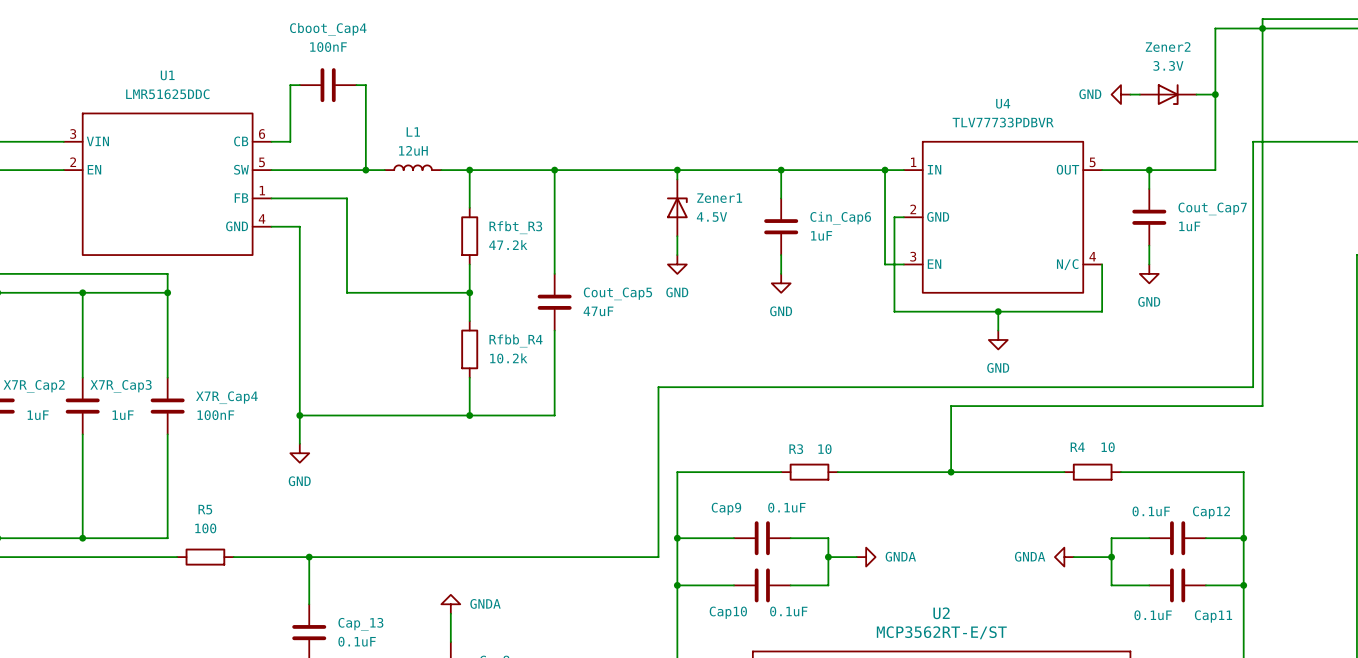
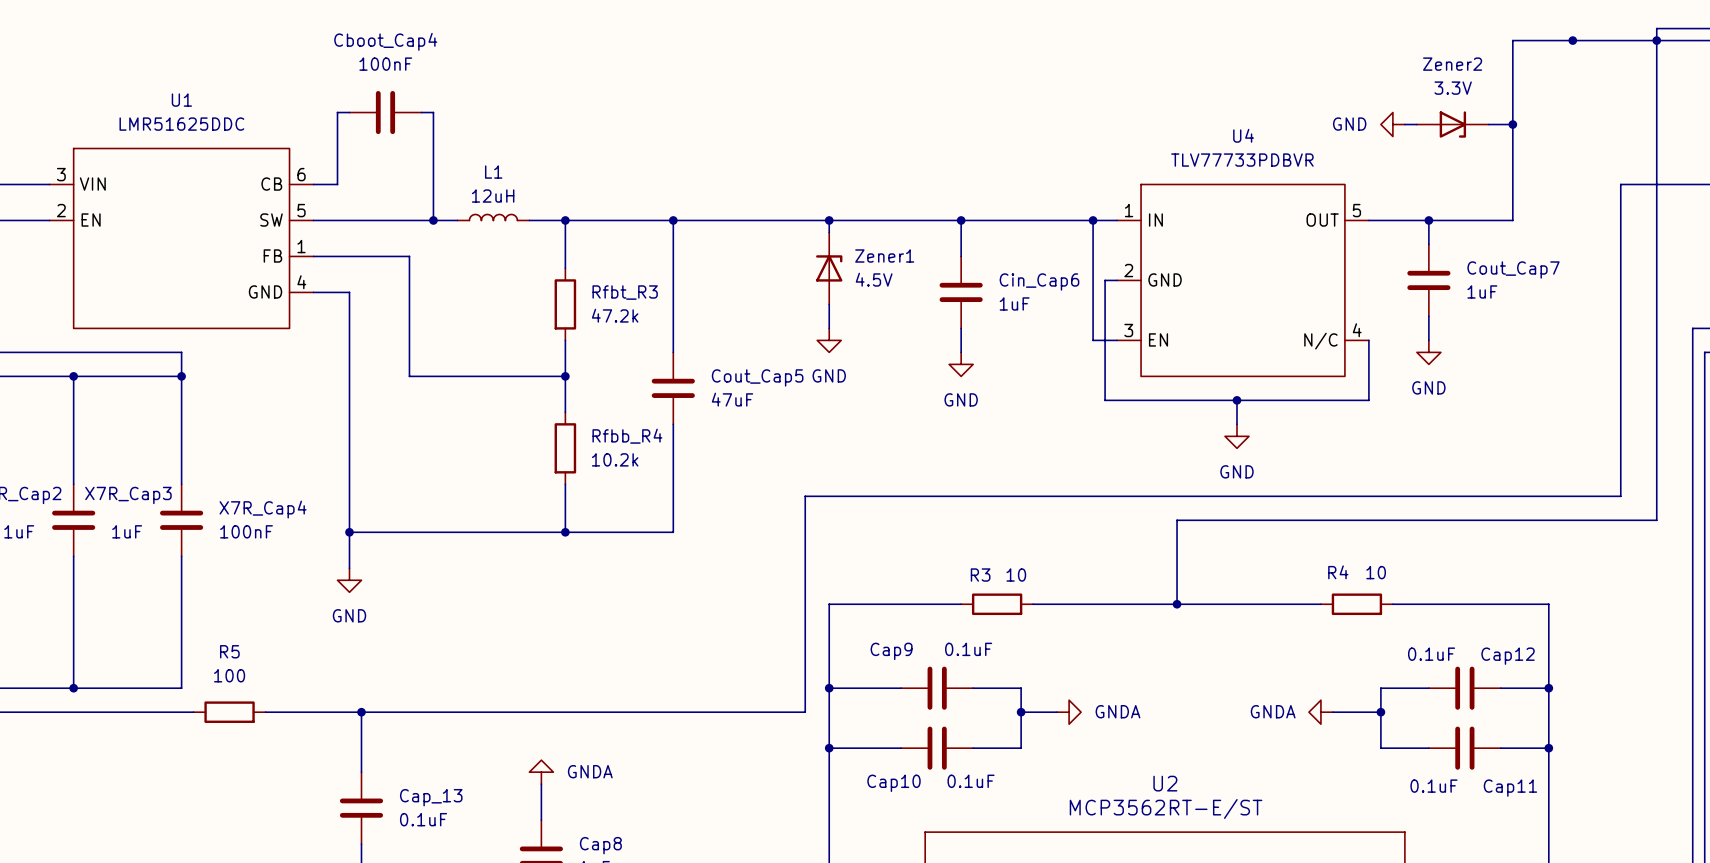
wire: (1328, 19) (1262, 19) (1262, 406) -> (1656, 28) (1656, 520) (1572, 520)
junction: none -> (1656, 40)
wire: (1300, 141) (1253, 141) (1253, 387) -> (1620, 184) (1620, 496) (1560, 496)

